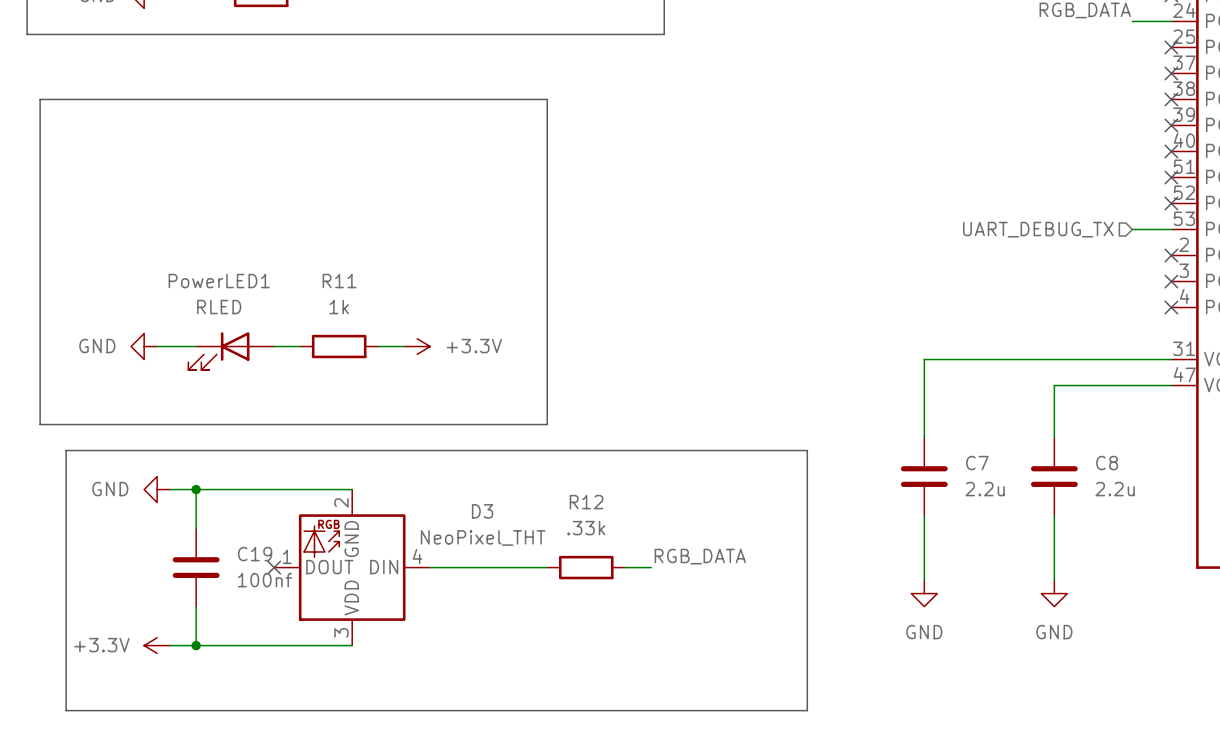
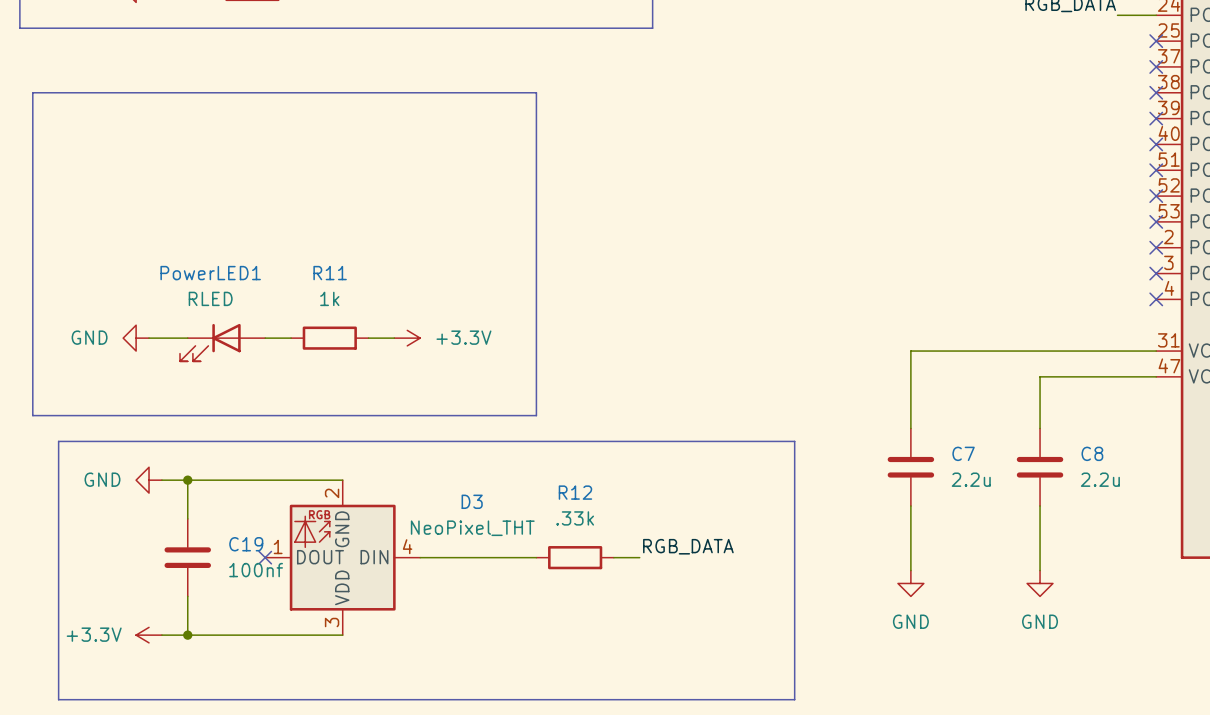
hierarchical label: UART_DEBUG_TX (1038, 229) -> none
wire: (1132, 229) (1171, 229) -> none
no-connect mark: none -> (1156, 221)

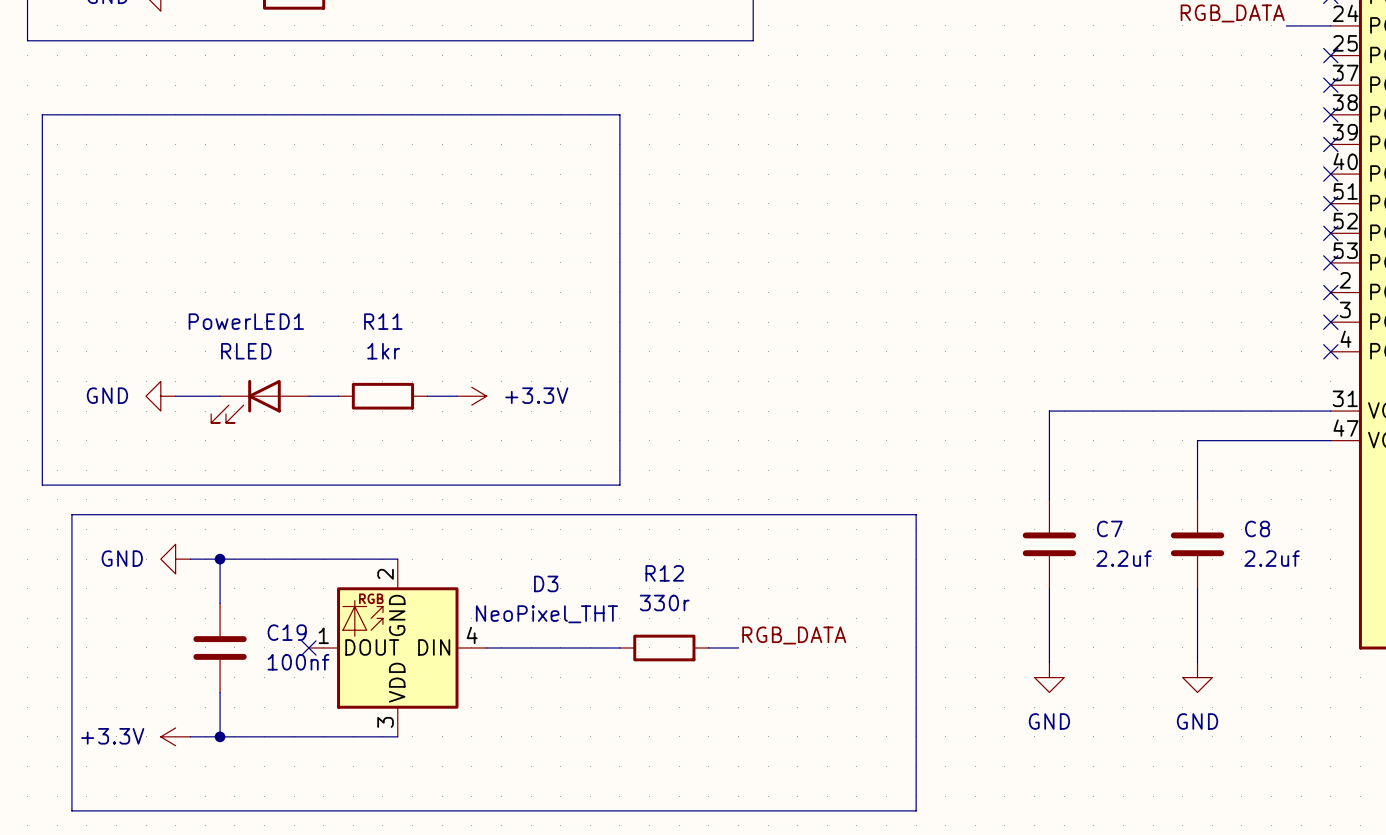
R11 value: 1k (329, 298) -> 1kr (383, 351)
C7 value: 2.2u (971, 479) -> 2.2uf (1123, 558)
C8 value: 2.2u (1100, 479) -> 2.2uf (1272, 558)
R12 value: .33k (575, 518) -> 330r (664, 603)

